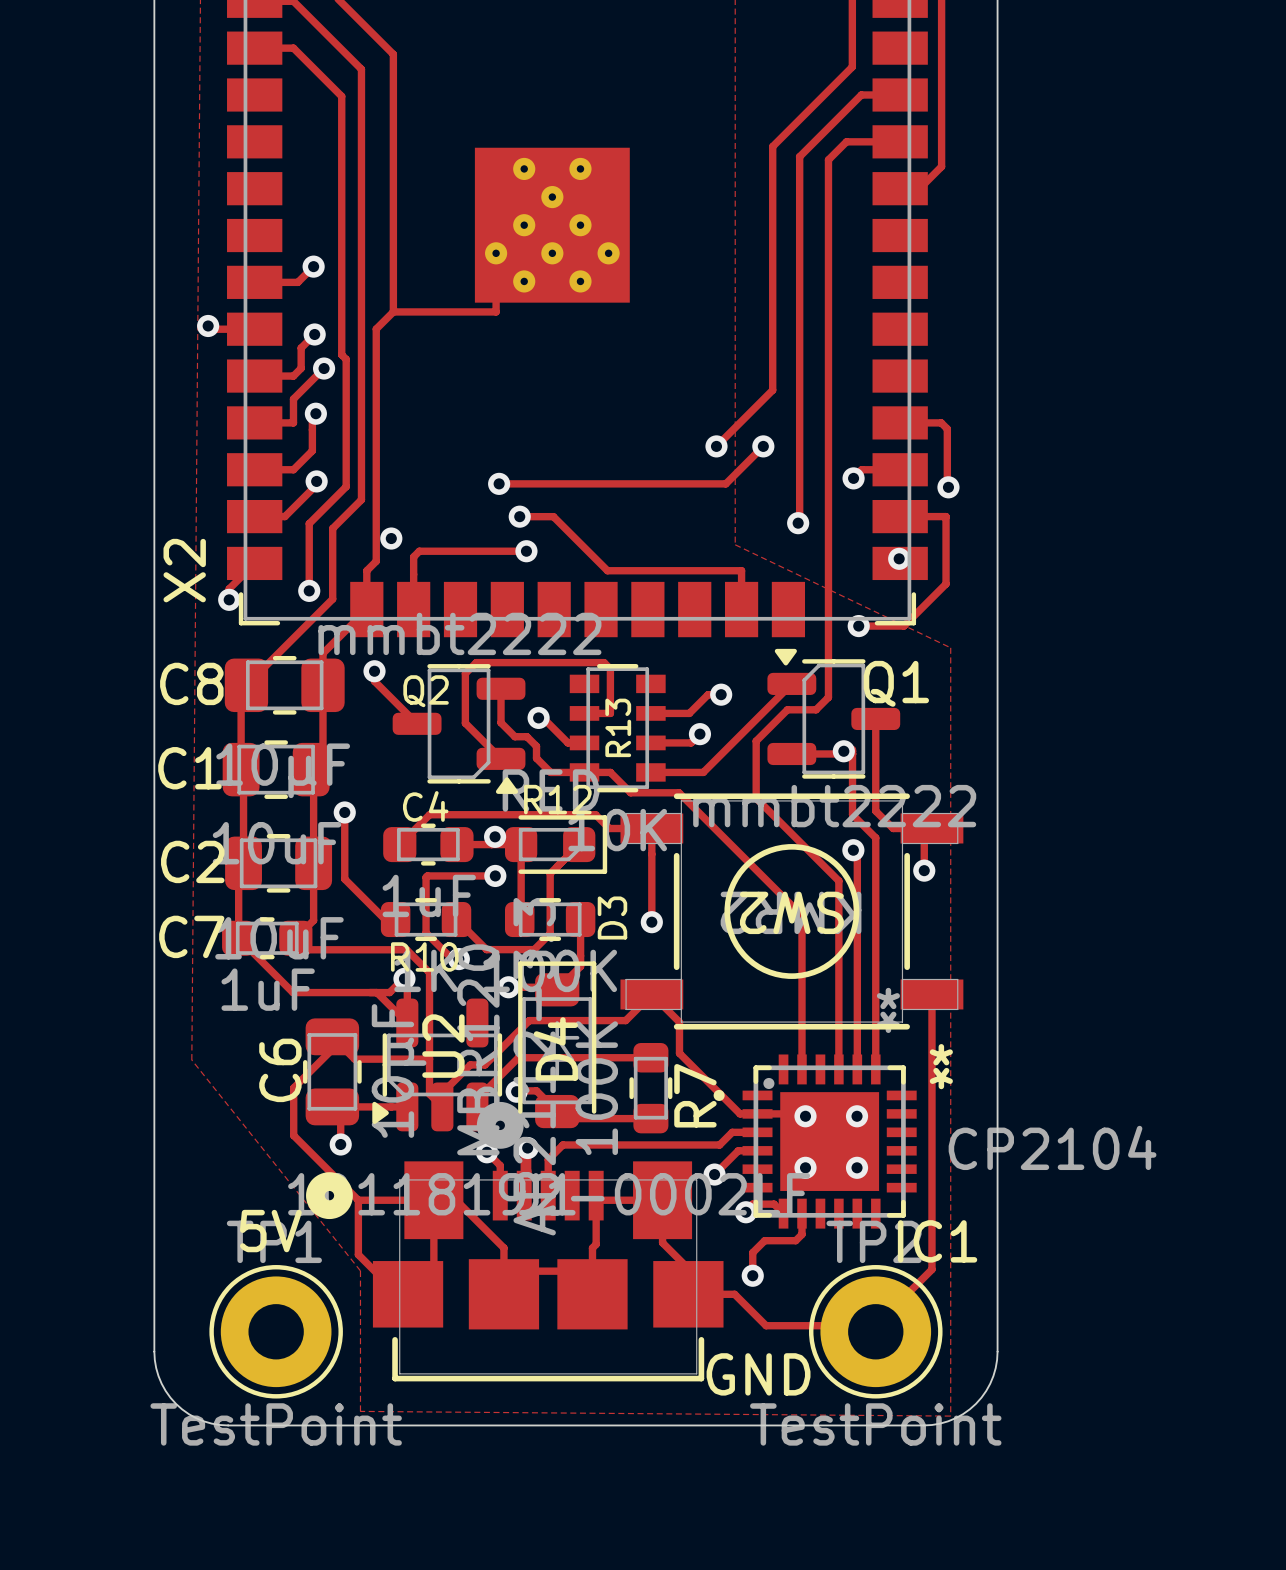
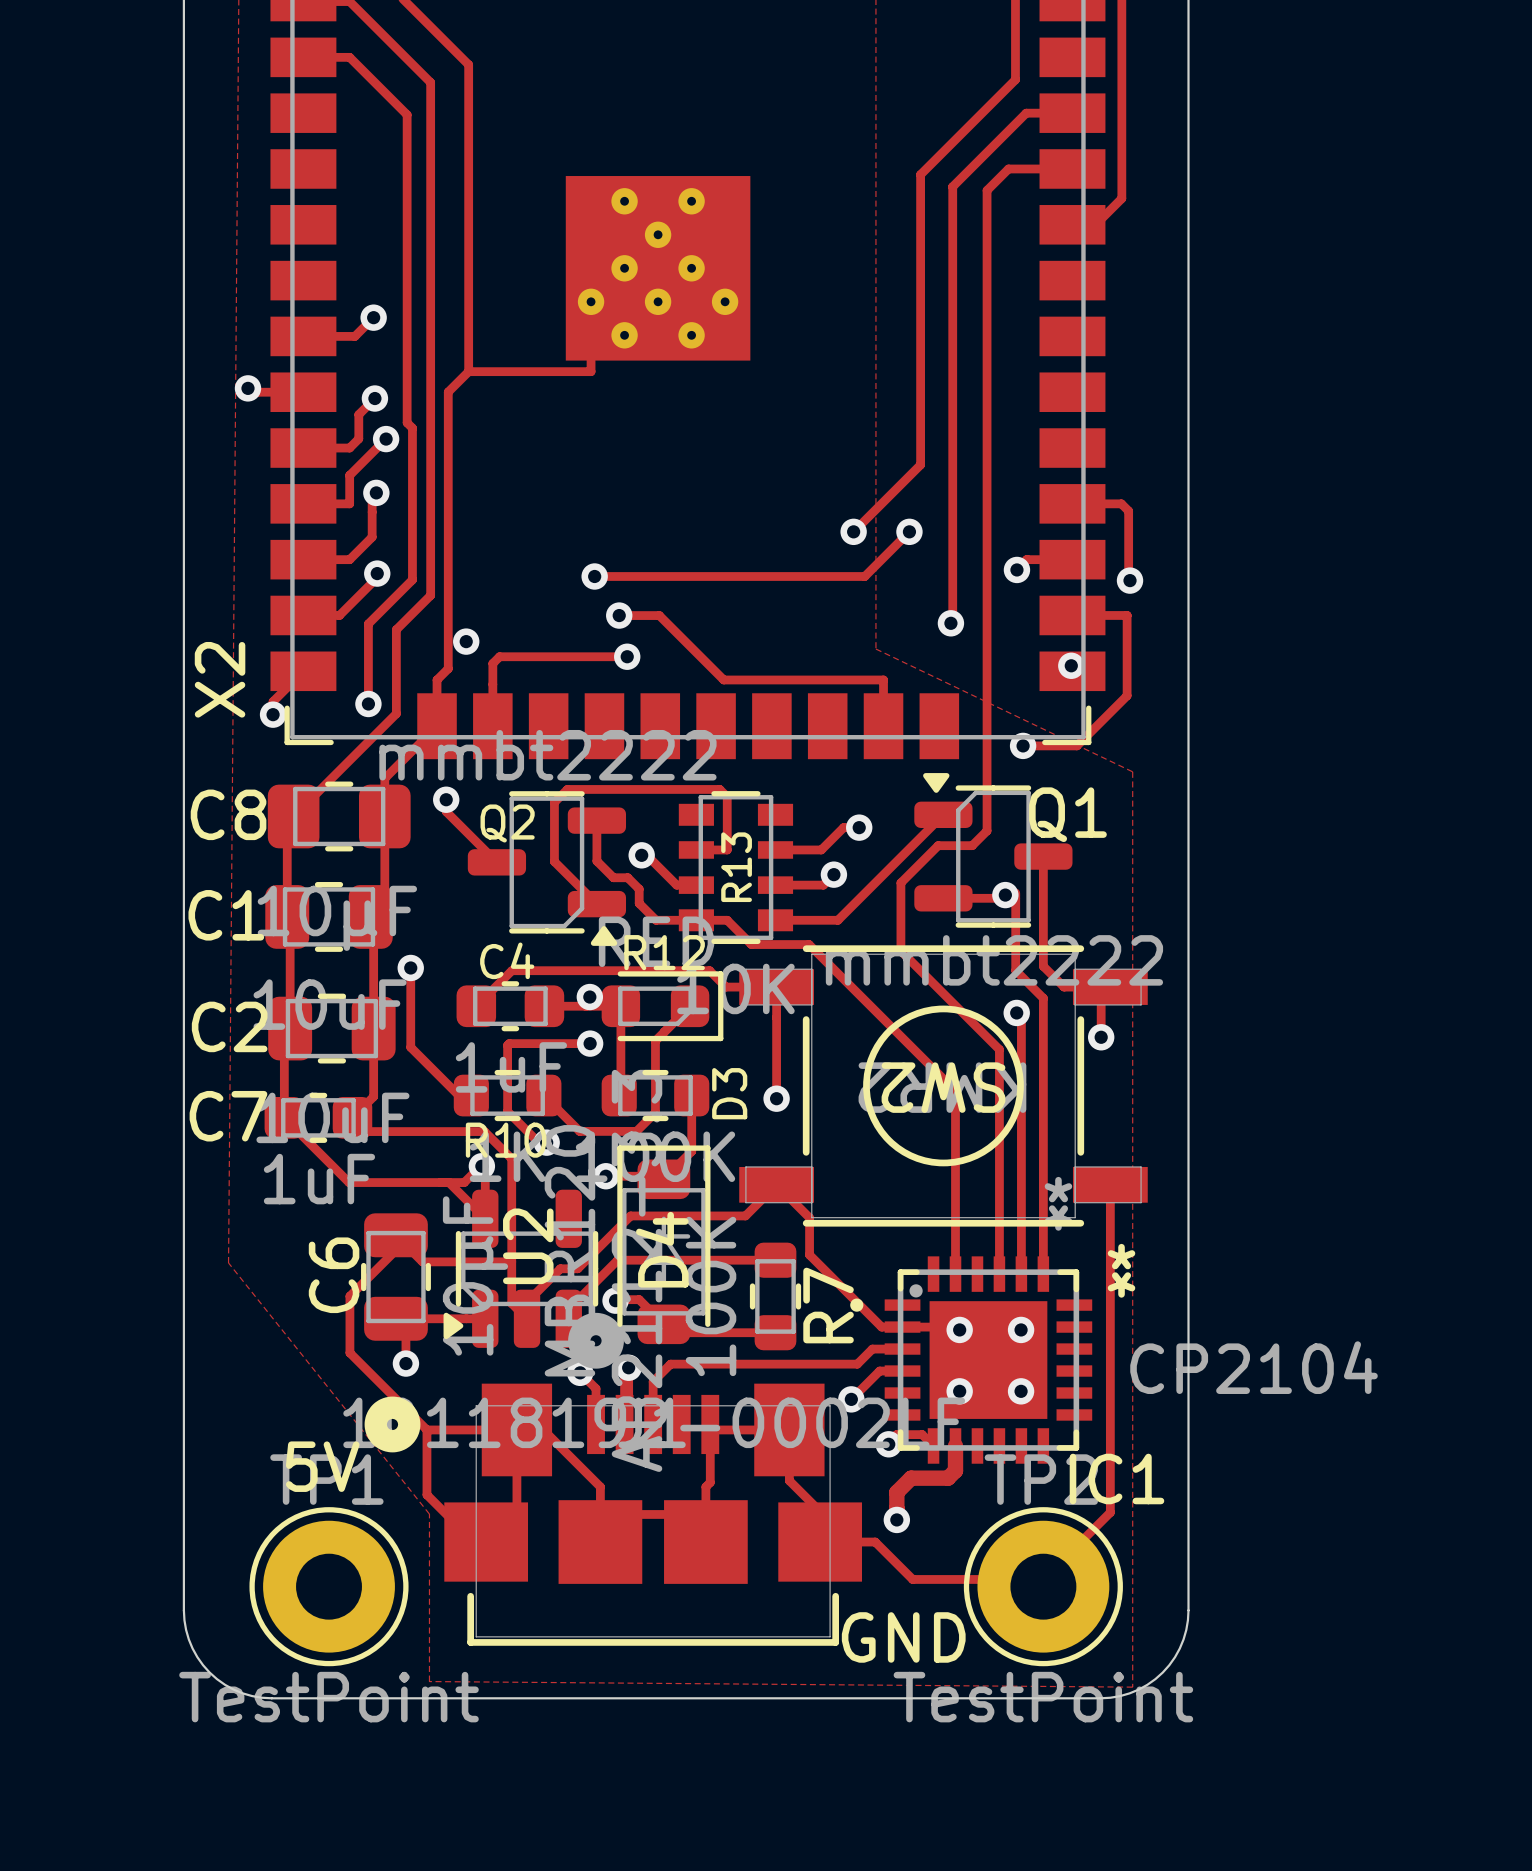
track width: thin (801, 1213) (801, 1234) (795, 1240) (764, 1240) (752, 1252) (752, 1280) -> thick (955, 1445) (955, 1470) (948, 1478) (911, 1478) (896, 1492) (896, 1525)

